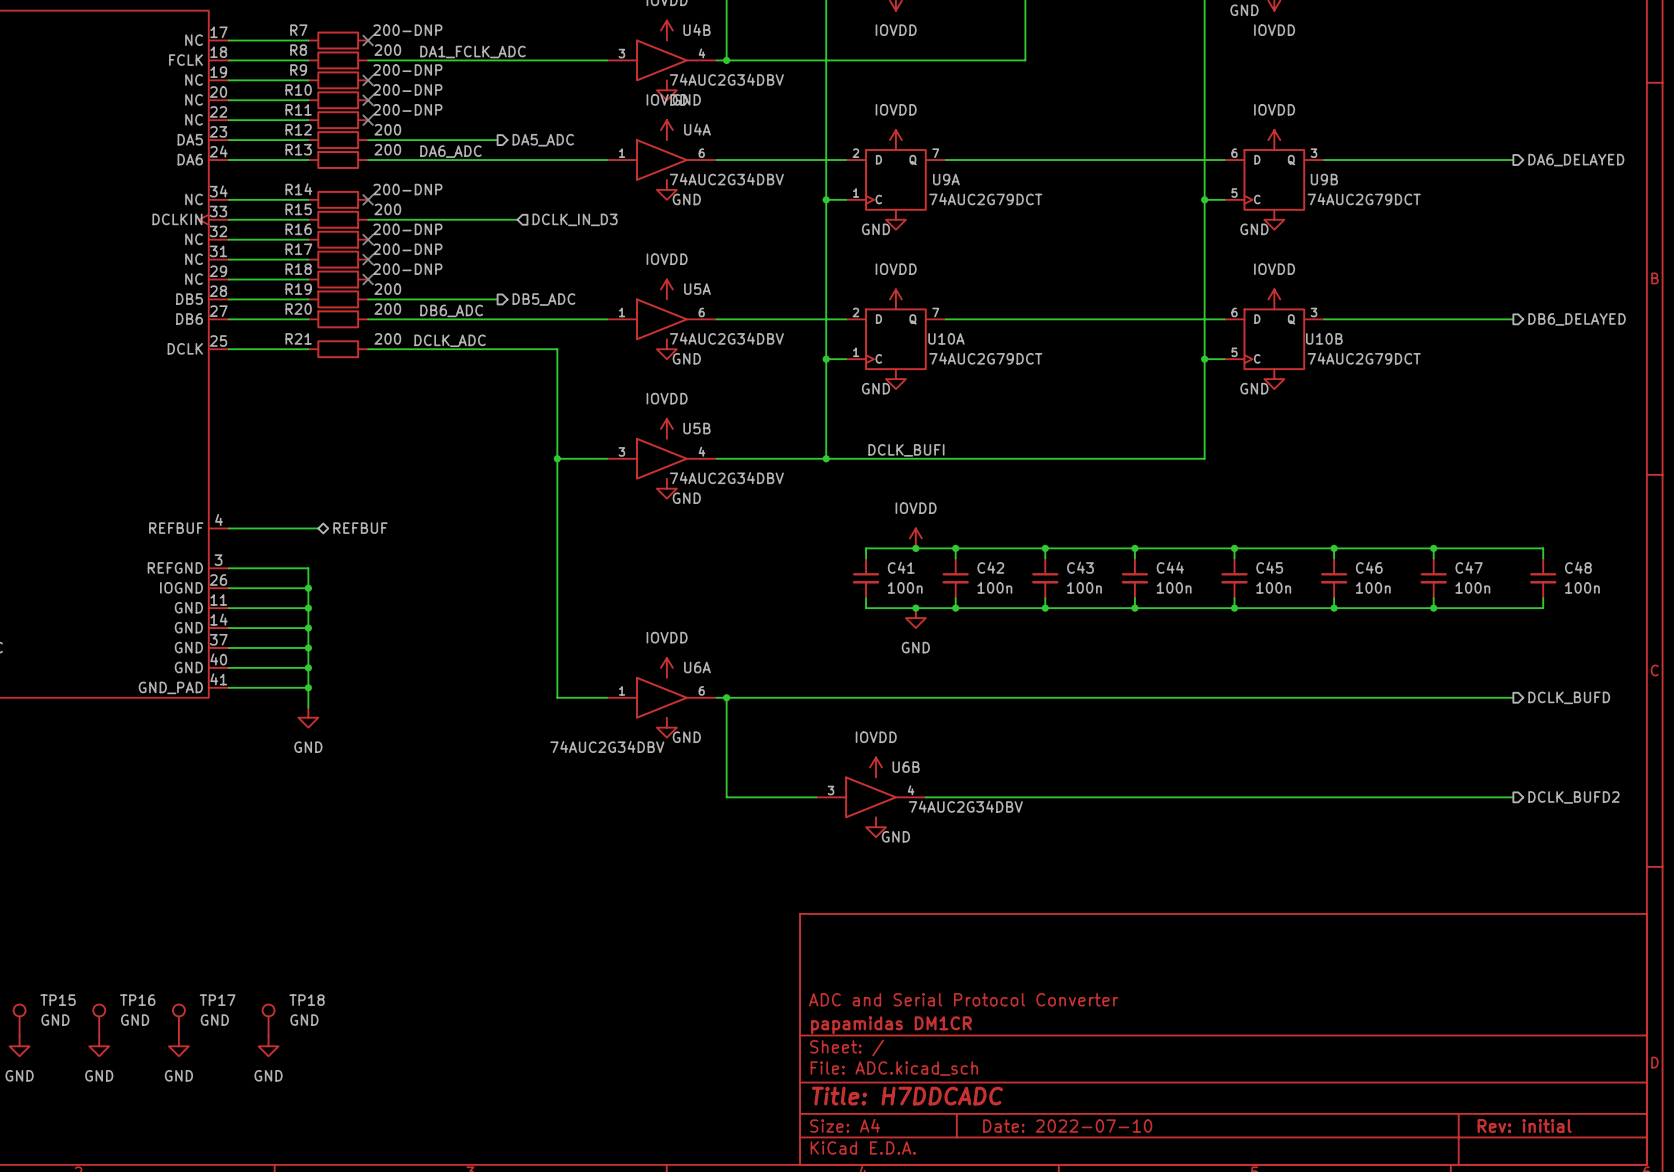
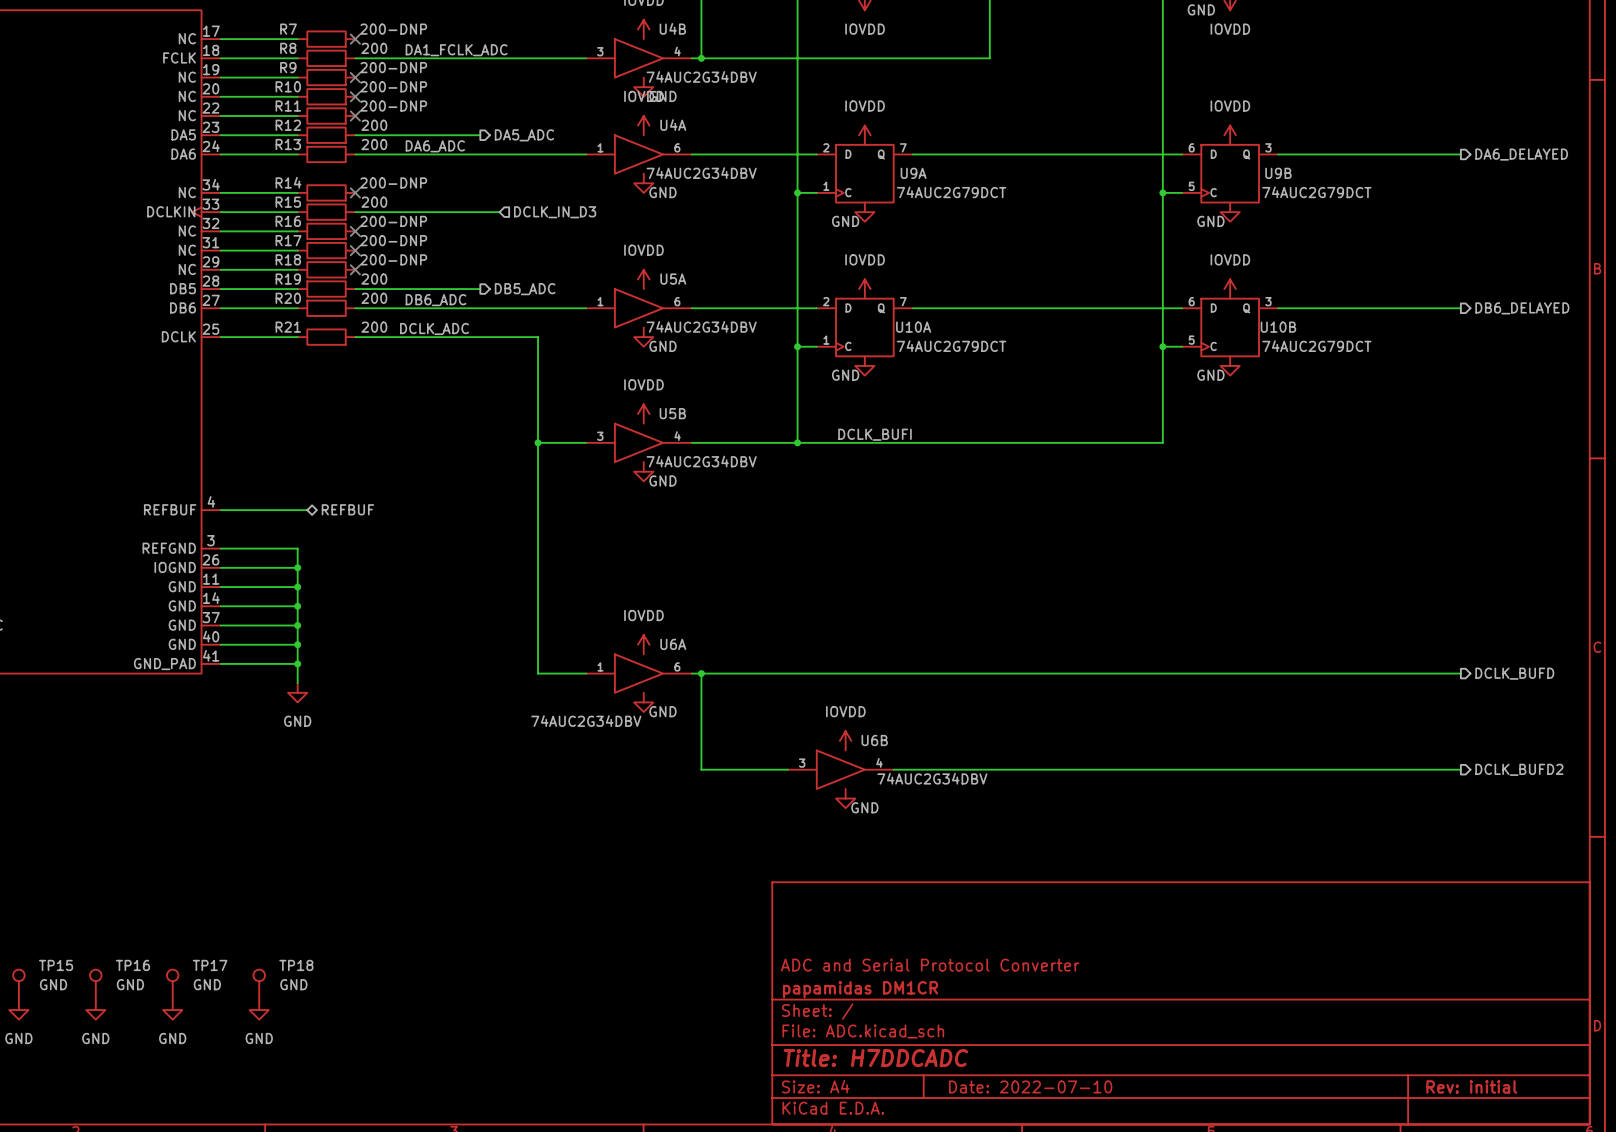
power symbol: IOVDD (915, 538) -> none
junction: (915, 548) -> none
wire: (955, 548) (955, 558) -> none
junction: (955, 548) -> none
wire: (1045, 548) (1045, 558) -> none
junction: (1045, 548) -> none
wire: (1134, 548) (1134, 558) -> none
junction: (1134, 548) -> none
wire: (1234, 548) (1234, 558) -> none
junction: (1234, 548) -> none
wire: (1334, 548) (1334, 558) -> none
junction: (1334, 548) -> none
wire: (1433, 548) (1433, 558) -> none
junction: (1433, 548) -> none
wire: (866, 558) (866, 548) (1543, 548) (1543, 558) -> none
C41: 100n (866, 578) -> none
C42: 100n (955, 578) -> none
C43: 100n (1045, 578) -> none
C44: 100n (1134, 578) -> none
C45: 100n (1234, 578) -> none
C46: 100n (1334, 578) -> none
C47: 100n (1433, 578) -> none
C48: 100n (1543, 578) -> none
wire: (866, 598) (866, 608) (1543, 608) (1543, 598) -> none
wire: (955, 598) (955, 608) -> none
wire: (1045, 598) (1045, 608) -> none
wire: (1134, 598) (1134, 608) -> none
wire: (1234, 598) (1234, 608) -> none
wire: (1334, 598) (1334, 608) -> none
wire: (1433, 598) (1433, 608) -> none
junction: (915, 608) -> none
junction: (955, 608) -> none
junction: (1045, 608) -> none
junction: (1134, 608) -> none
junction: (1234, 608) -> none
junction: (1334, 608) -> none
junction: (1433, 608) -> none
power symbol: GND (915, 618) -> none

